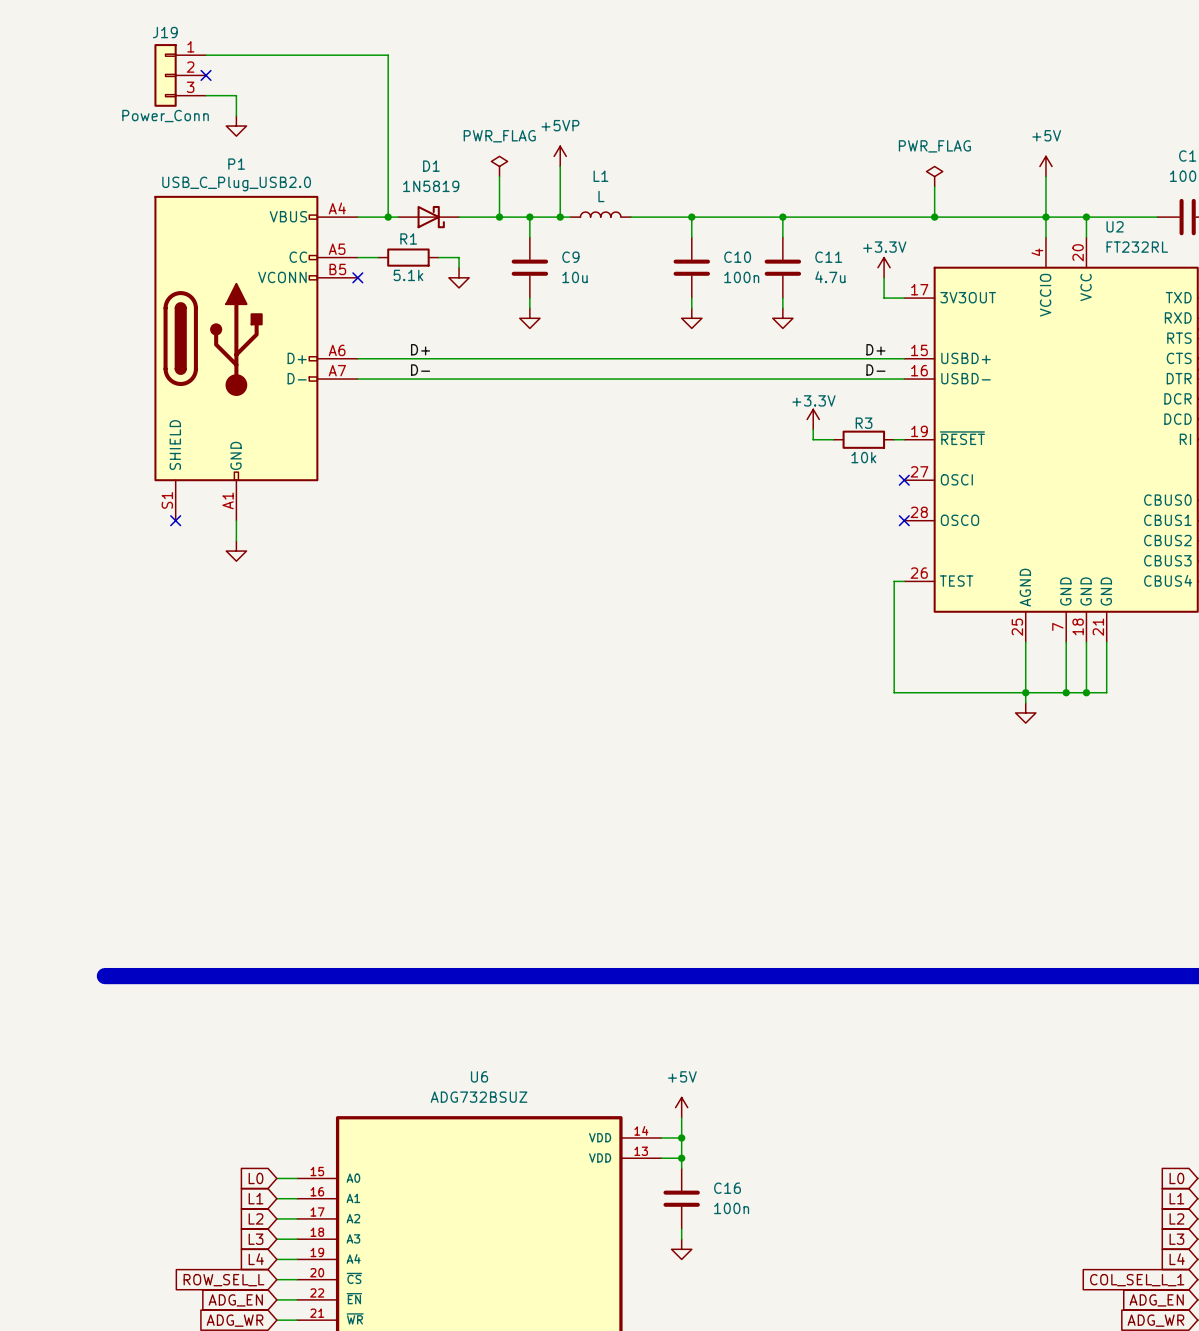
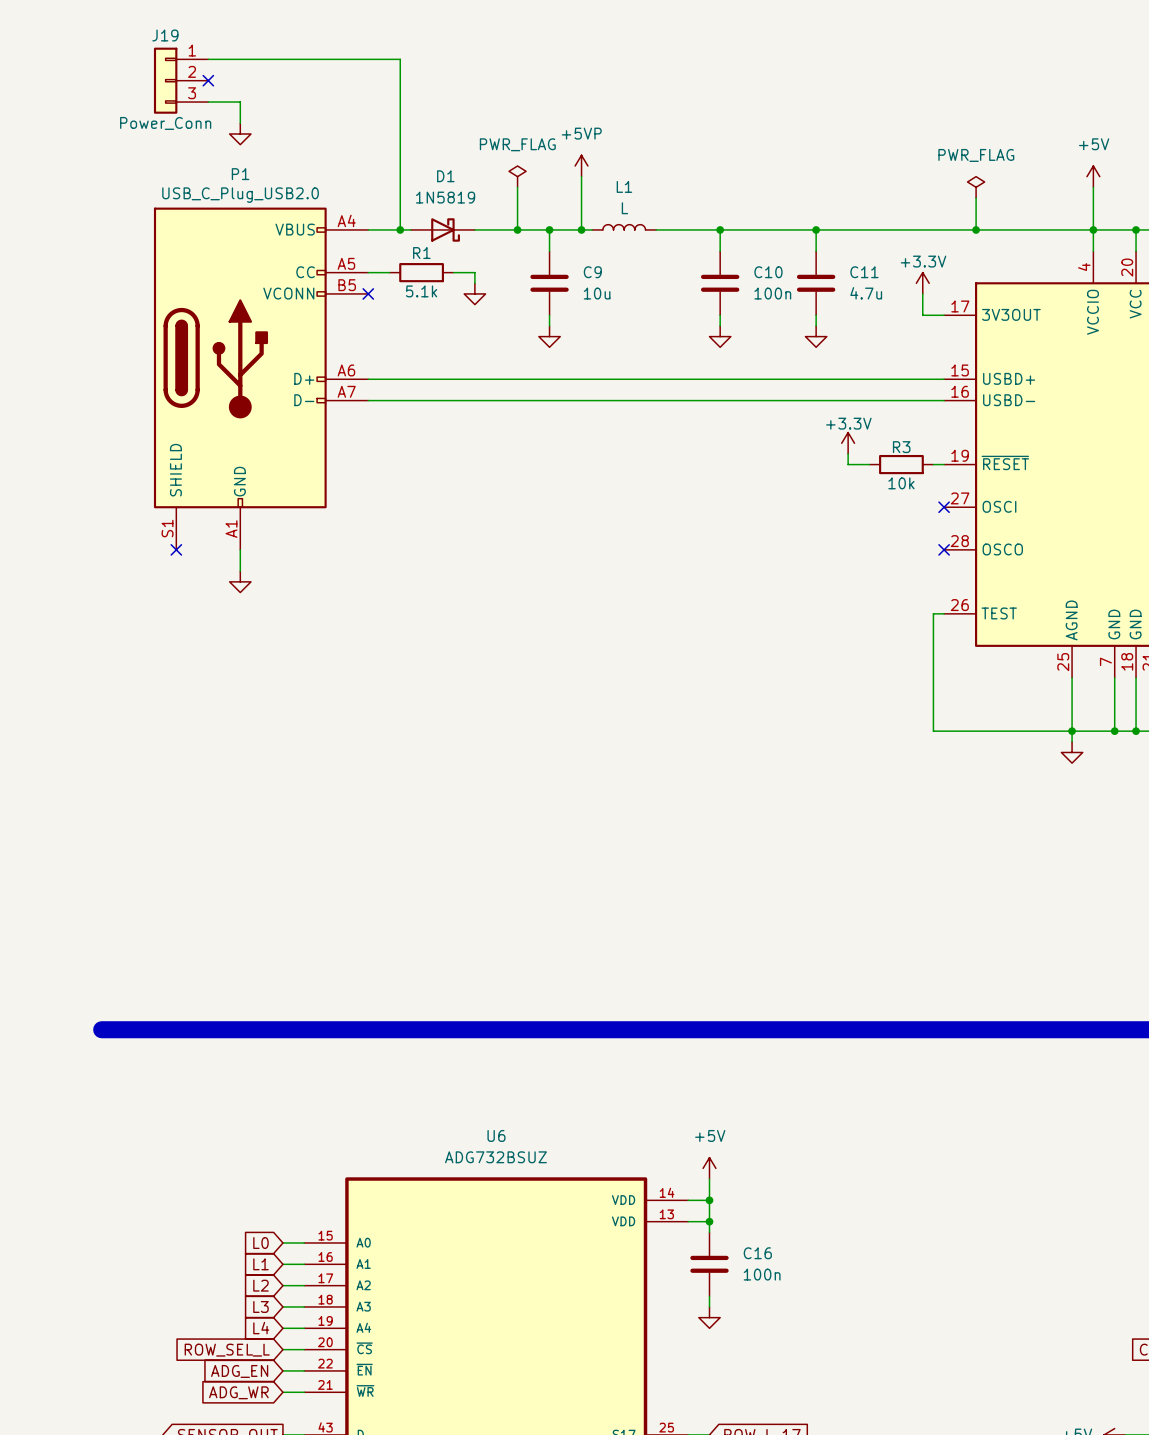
label: D+ (420, 349) -> none
label: D+ (875, 349) -> none
label: D- (420, 369) -> none
label: D- (875, 369) -> none

